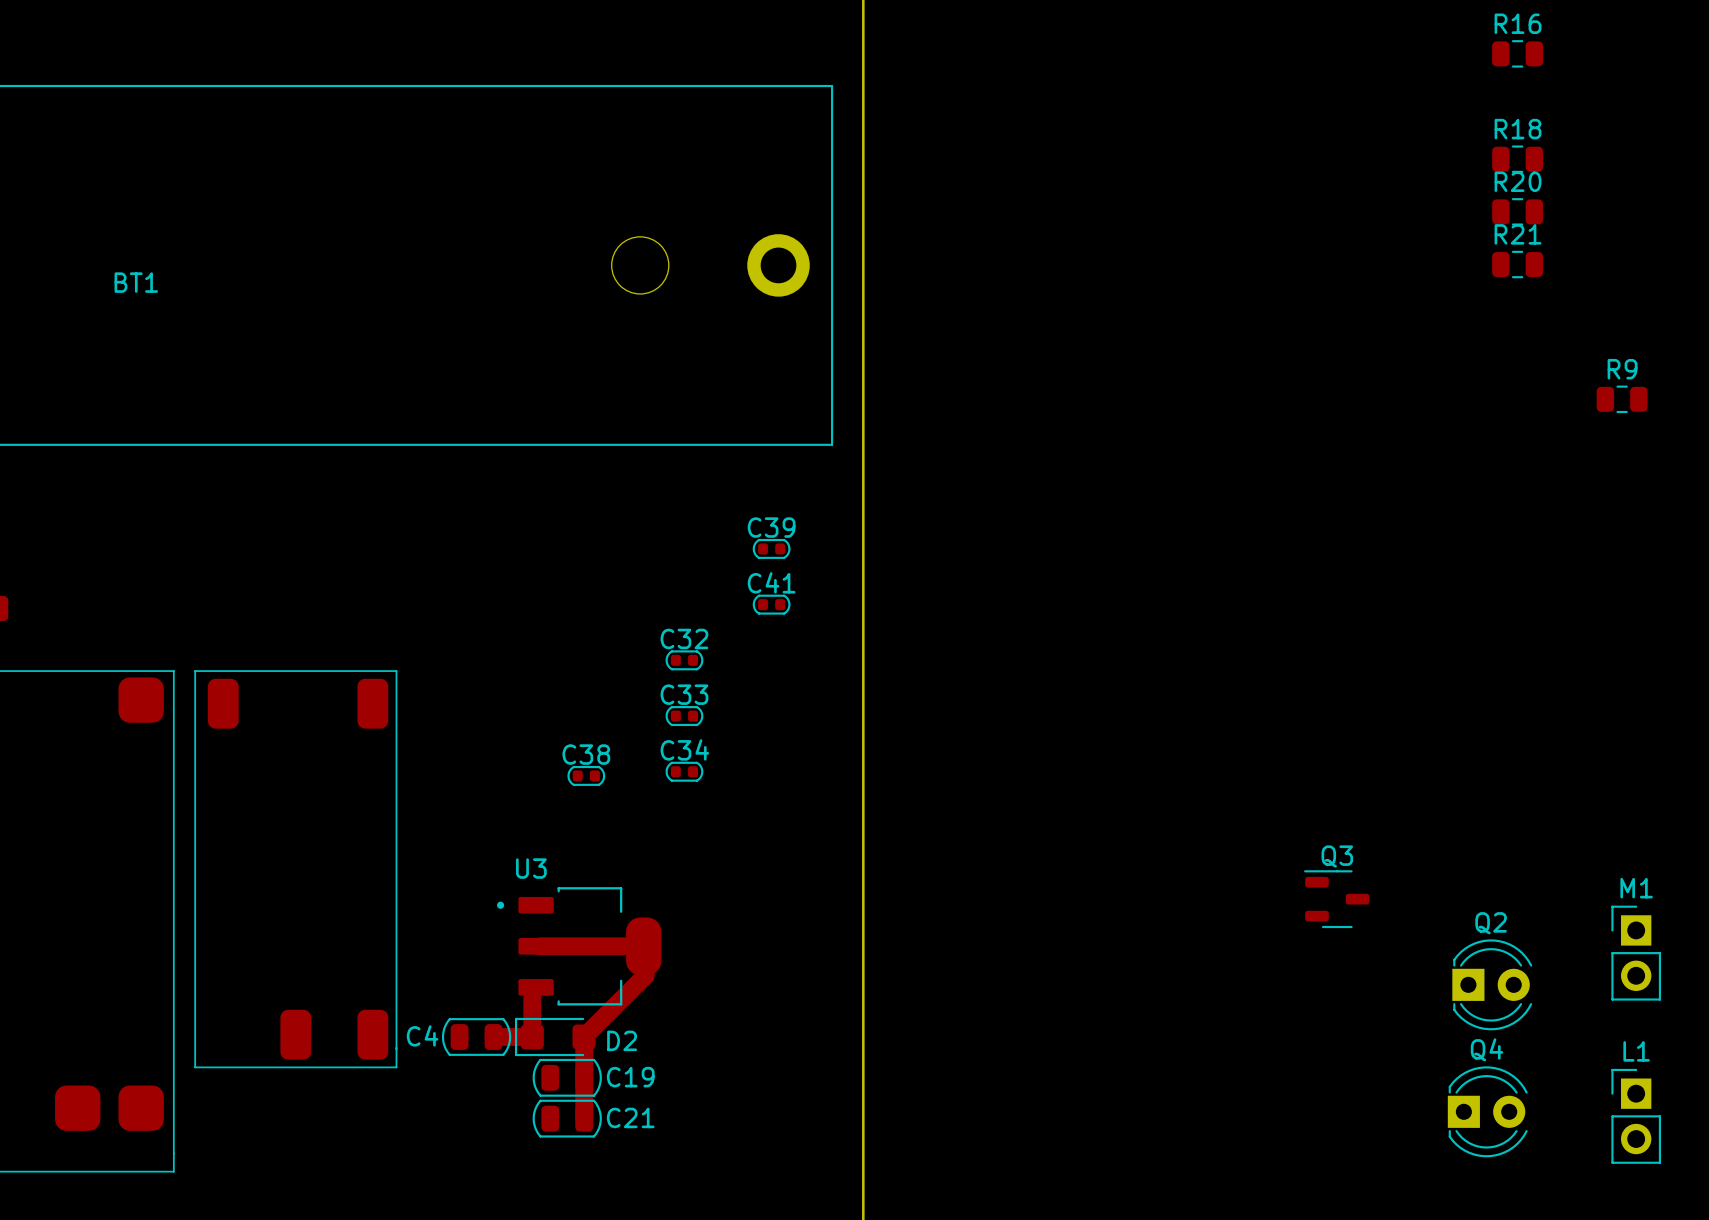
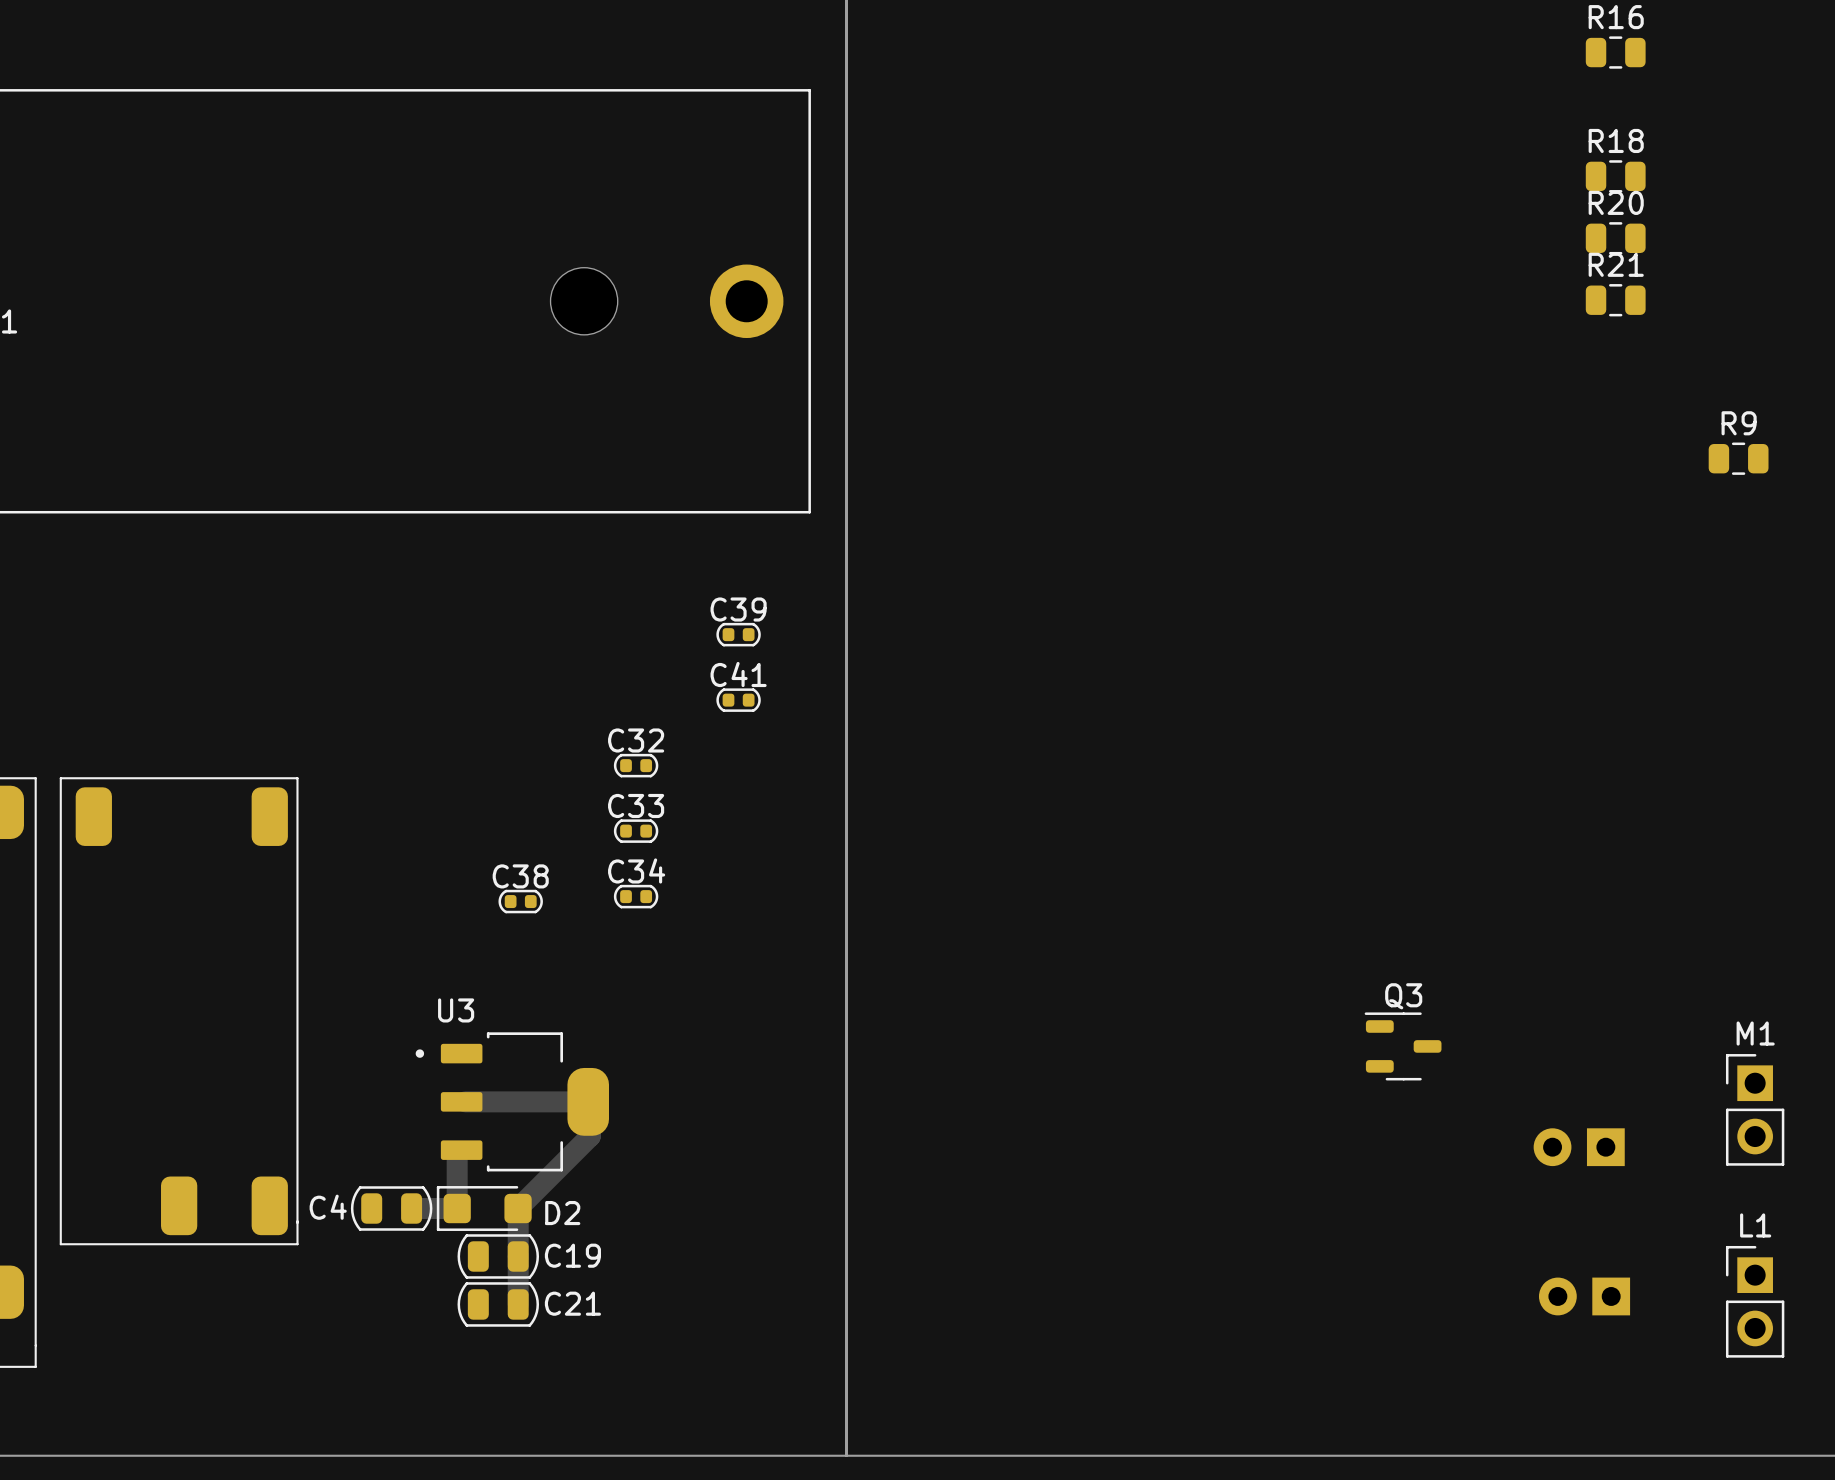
Q2 side: top (1492, 984) -> bottom (1579, 1147)
Q4 side: top (1487, 1111) -> bottom (1584, 1296)

